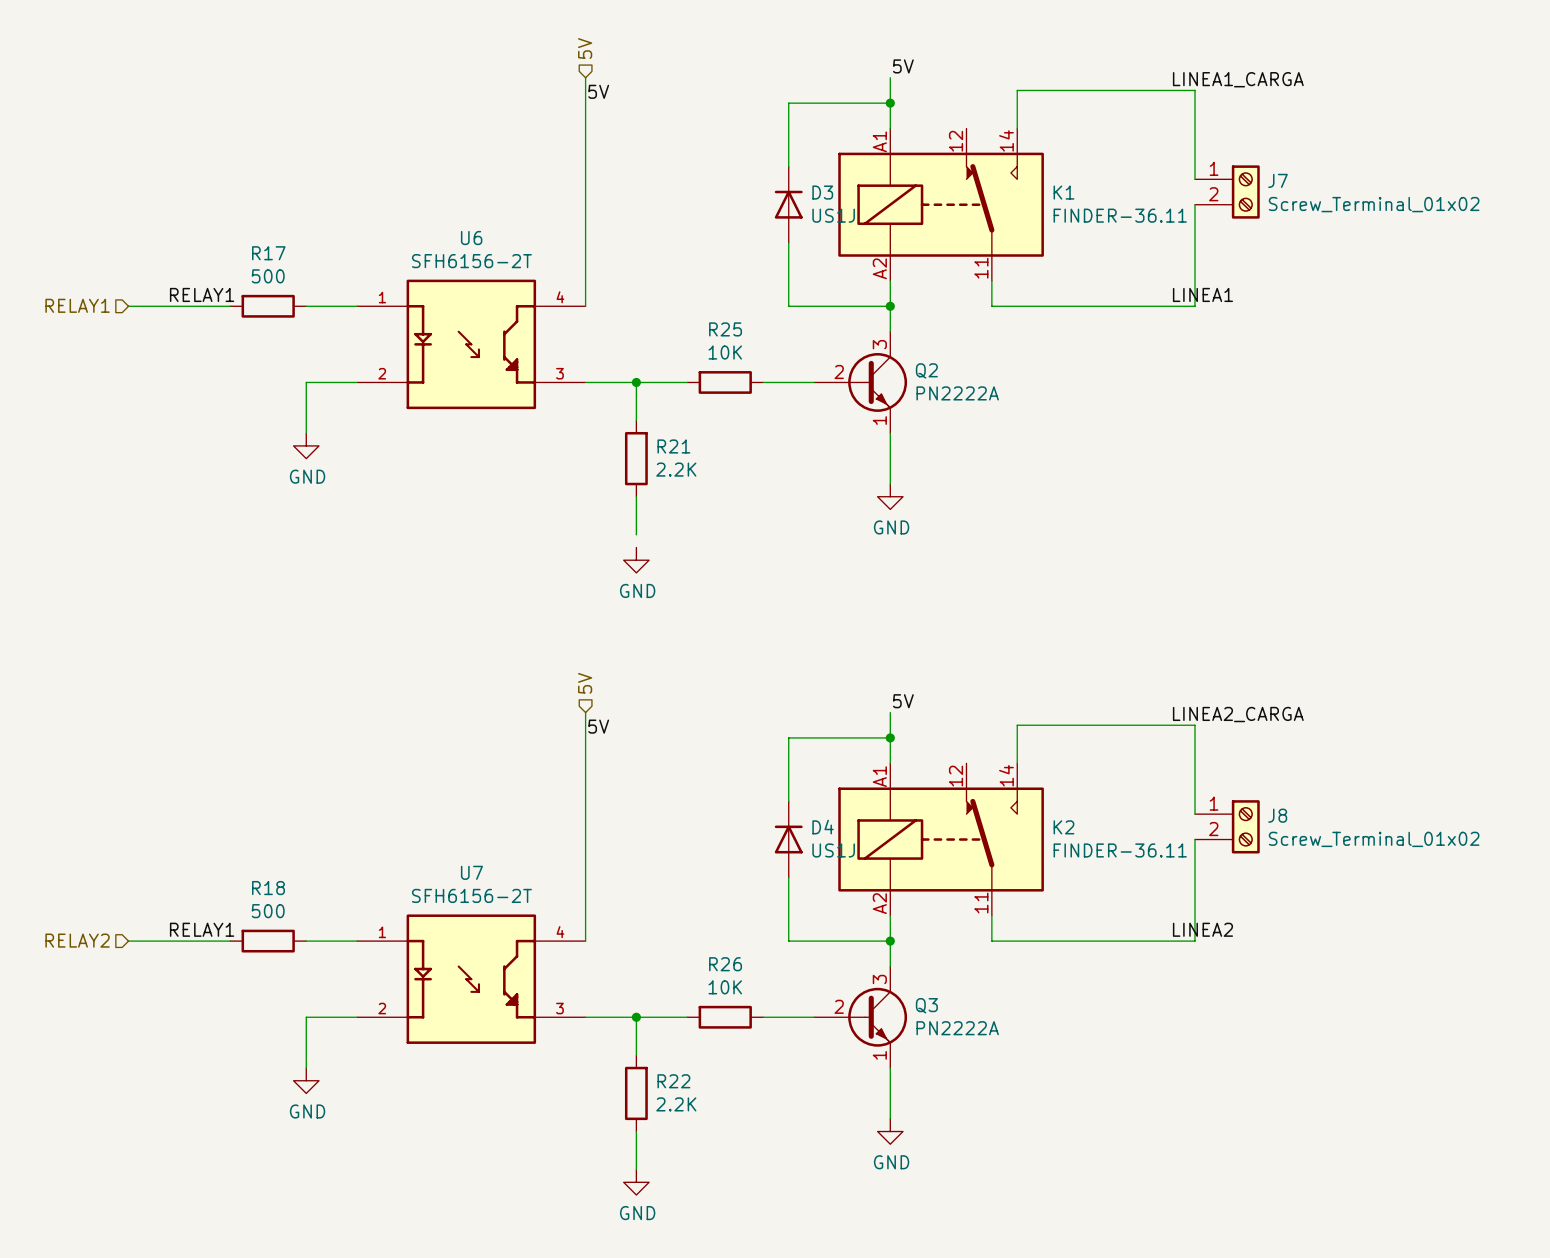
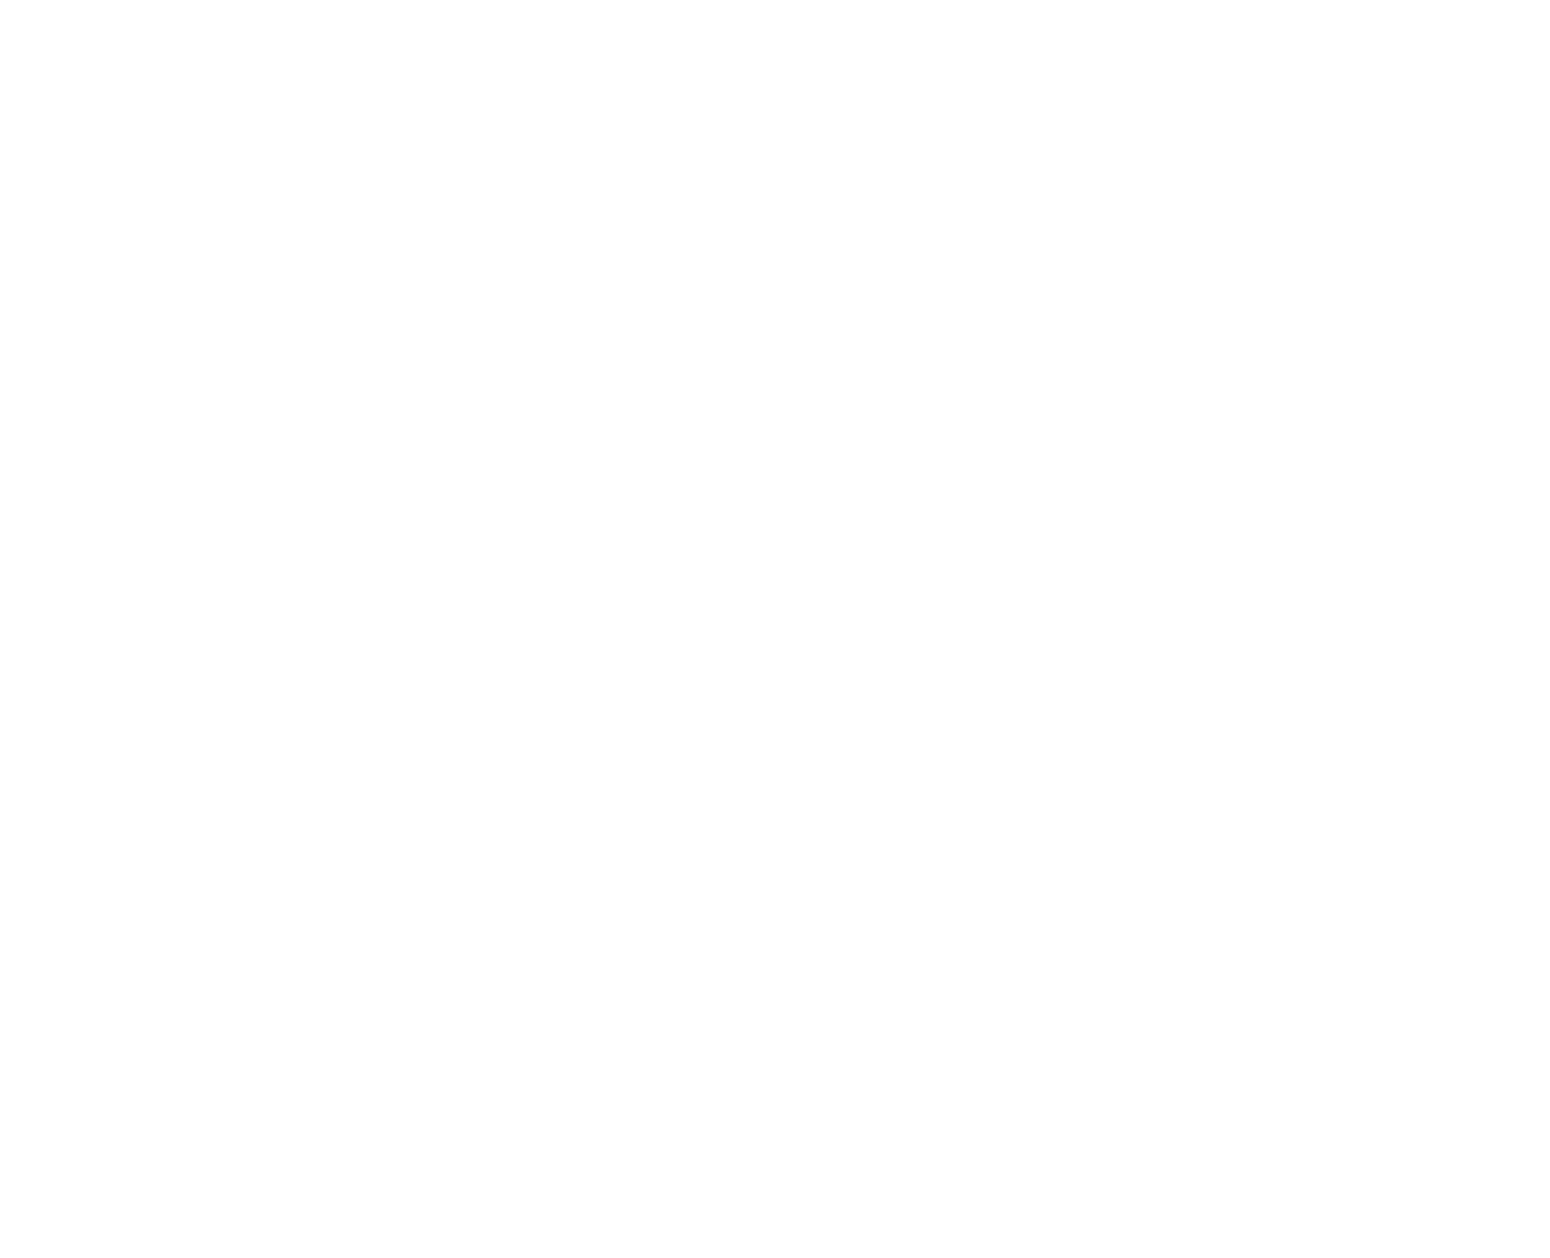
hierarchical label: 5V (585, 48) -> none
label: 5V (903, 66) -> none
wire: (585, 77) (585, 306) -> none
wire: (890, 77) (890, 128) -> none
label: LINEA1_CARGA (1238, 79) -> none
label: 5V (598, 91) -> none
wire: (890, 103) (788, 103) (788, 166) -> none
junction: (890, 103) -> none
wire: (1017, 128) (1017, 90) (1195, 90) (1195, 179) -> none
J7: Screw_Terminal_01x02 (1227, 192) -> none
D3: US1J (788, 204) -> none
K1: FINDER-36.11 (941, 204) -> none
wire: (1195, 204) (1195, 306) (991, 306) (991, 280) -> none
wire: (788, 242) (788, 306) (890, 306) -> none
wire: (890, 280) (890, 331) -> none
label: RELAY1 (202, 294) -> none
label: LINEA1 (1202, 294) -> none
hierarchical label: RELAY1 (77, 305) -> none
wire: (128, 306) (230, 306) -> none
R17: 500 (268, 306) -> none
wire: (306, 306) (357, 306) -> none
junction: (890, 306) -> none
U6: SFH6156-2T (471, 344) -> none
wire: (357, 382) (306, 382) (306, 433) -> none
wire: (585, 382) (687, 382) -> none
wire: (636, 382) (636, 420) -> none
junction: (636, 382) -> none
R25: 10K (725, 382) -> none
wire: (763, 382) (814, 382) -> none
Q2: PN2222A (860, 382) -> none
wire: (890, 433) (890, 484) -> none
power symbol: GND (306, 445) -> none
R21: 2.2K (636, 458) -> none
wire: (636, 496) (636, 534) -> none
power symbol: GND (890, 496) -> none
power symbol: GND (636, 560) -> none
hierarchical label: 5V (585, 683) -> none
label: 5V (903, 701) -> none
wire: (585, 712) (585, 941) -> none
wire: (890, 712) (890, 763) -> none
label: LINEA2_CARGA (1238, 714) -> none
label: 5V (598, 726) -> none
wire: (890, 737) (788, 737) (788, 801) -> none
junction: (890, 737) -> none
wire: (1017, 763) (1017, 725) (1195, 725) (1195, 814) -> none
J8: Screw_Terminal_01x02 (1227, 826) -> none
D4: US1J (788, 839) -> none
K2: FINDER-36.11 (941, 839) -> none
wire: (1195, 839) (1195, 941) (991, 941) (991, 915) -> none
wire: (788, 877) (788, 941) (890, 941) -> none
wire: (890, 915) (890, 966) -> none
label: RELAY1 (202, 929) -> none
label: LINEA2 (1202, 929) -> none
hierarchical label: RELAY2 (77, 940) -> none
wire: (128, 941) (230, 941) -> none
R18: 500 (268, 941) -> none
wire: (306, 941) (357, 941) -> none
junction: (890, 941) -> none
U7: SFH6156-2T (471, 979) -> none
wire: (357, 1017) (306, 1017) (306, 1068) -> none
wire: (585, 1017) (687, 1017) -> none
wire: (636, 1017) (636, 1055) -> none
junction: (636, 1017) -> none
R26: 10K (725, 1017) -> none
wire: (763, 1017) (814, 1017) -> none
Q3: PN2222A (860, 1017) -> none
wire: (890, 1068) (890, 1118) -> none
power symbol: GND (306, 1080) -> none
R22: 2.2K (636, 1093) -> none
wire: (636, 1131) (636, 1169) -> none
power symbol: GND (890, 1131) -> none
power symbol: GND (636, 1182) -> none

